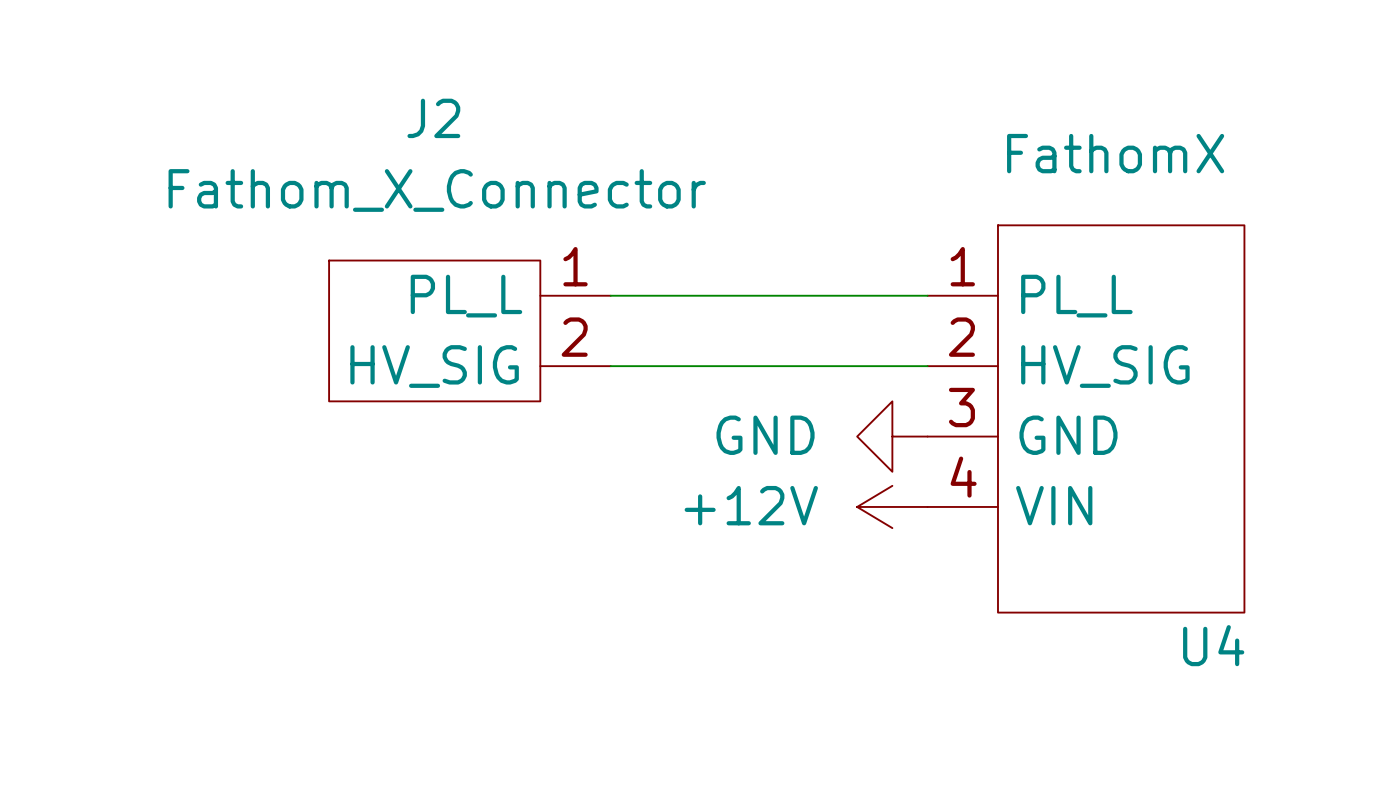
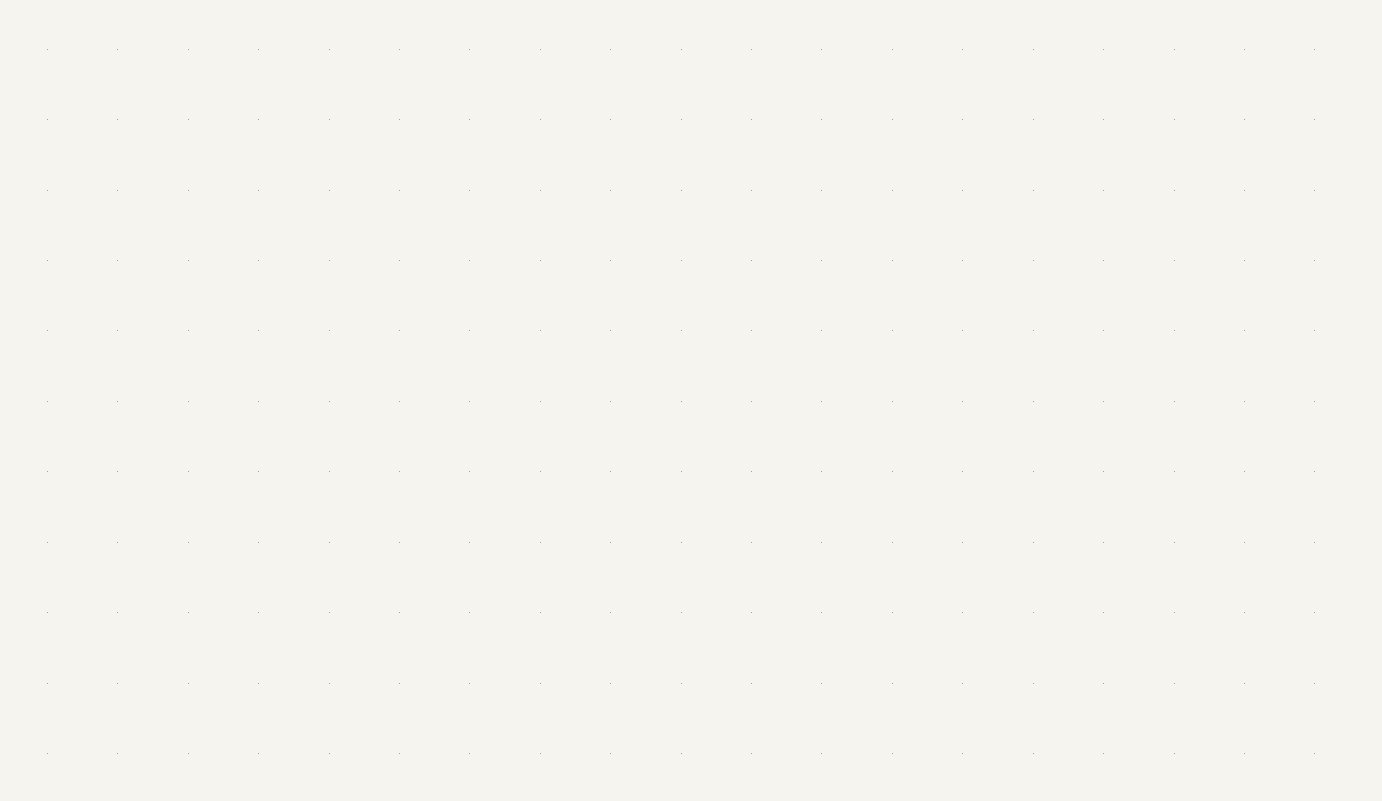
wire: (610, 295) (927, 295) -> none
J2: Fathom_X_Connector (469, 330) -> none
wire: (610, 366) (927, 366) -> none
U4: FathomX (1086, 418) -> none
power symbol: GND (892, 436) -> none
power symbol: +12V (892, 506) -> none

